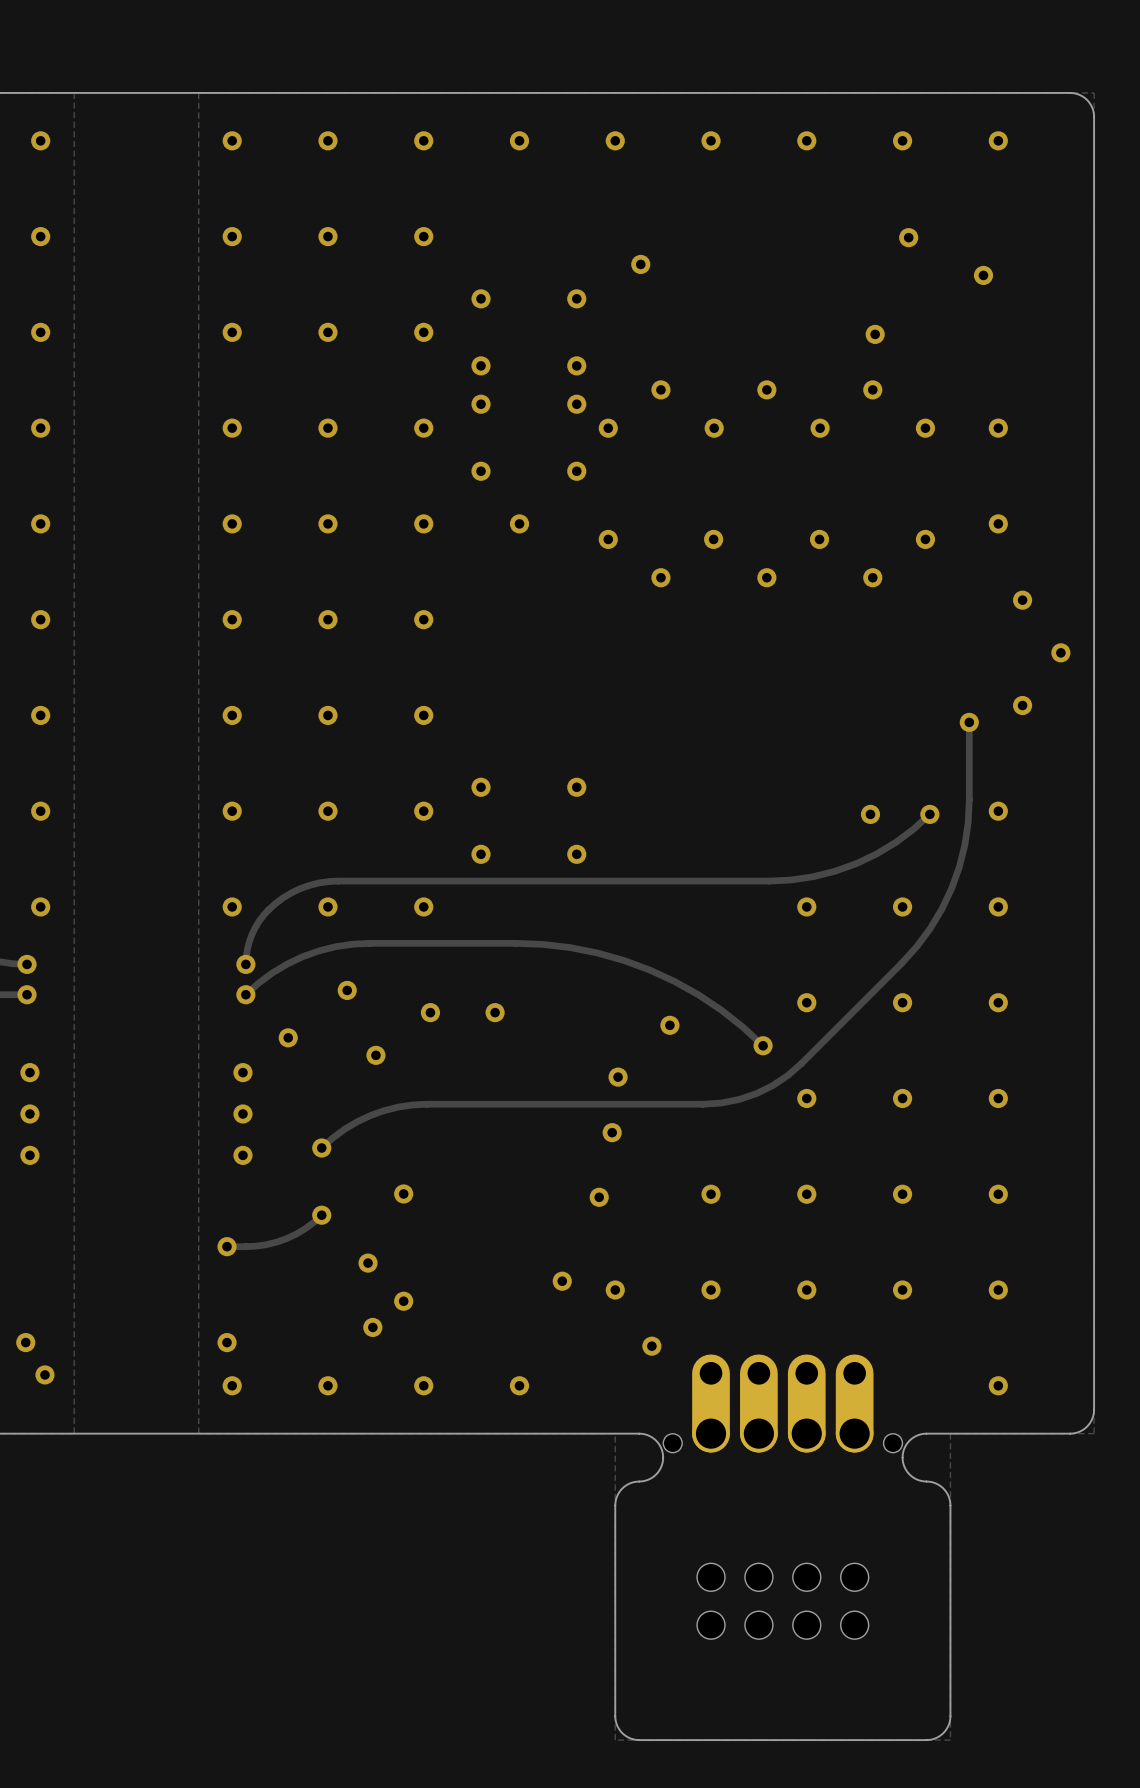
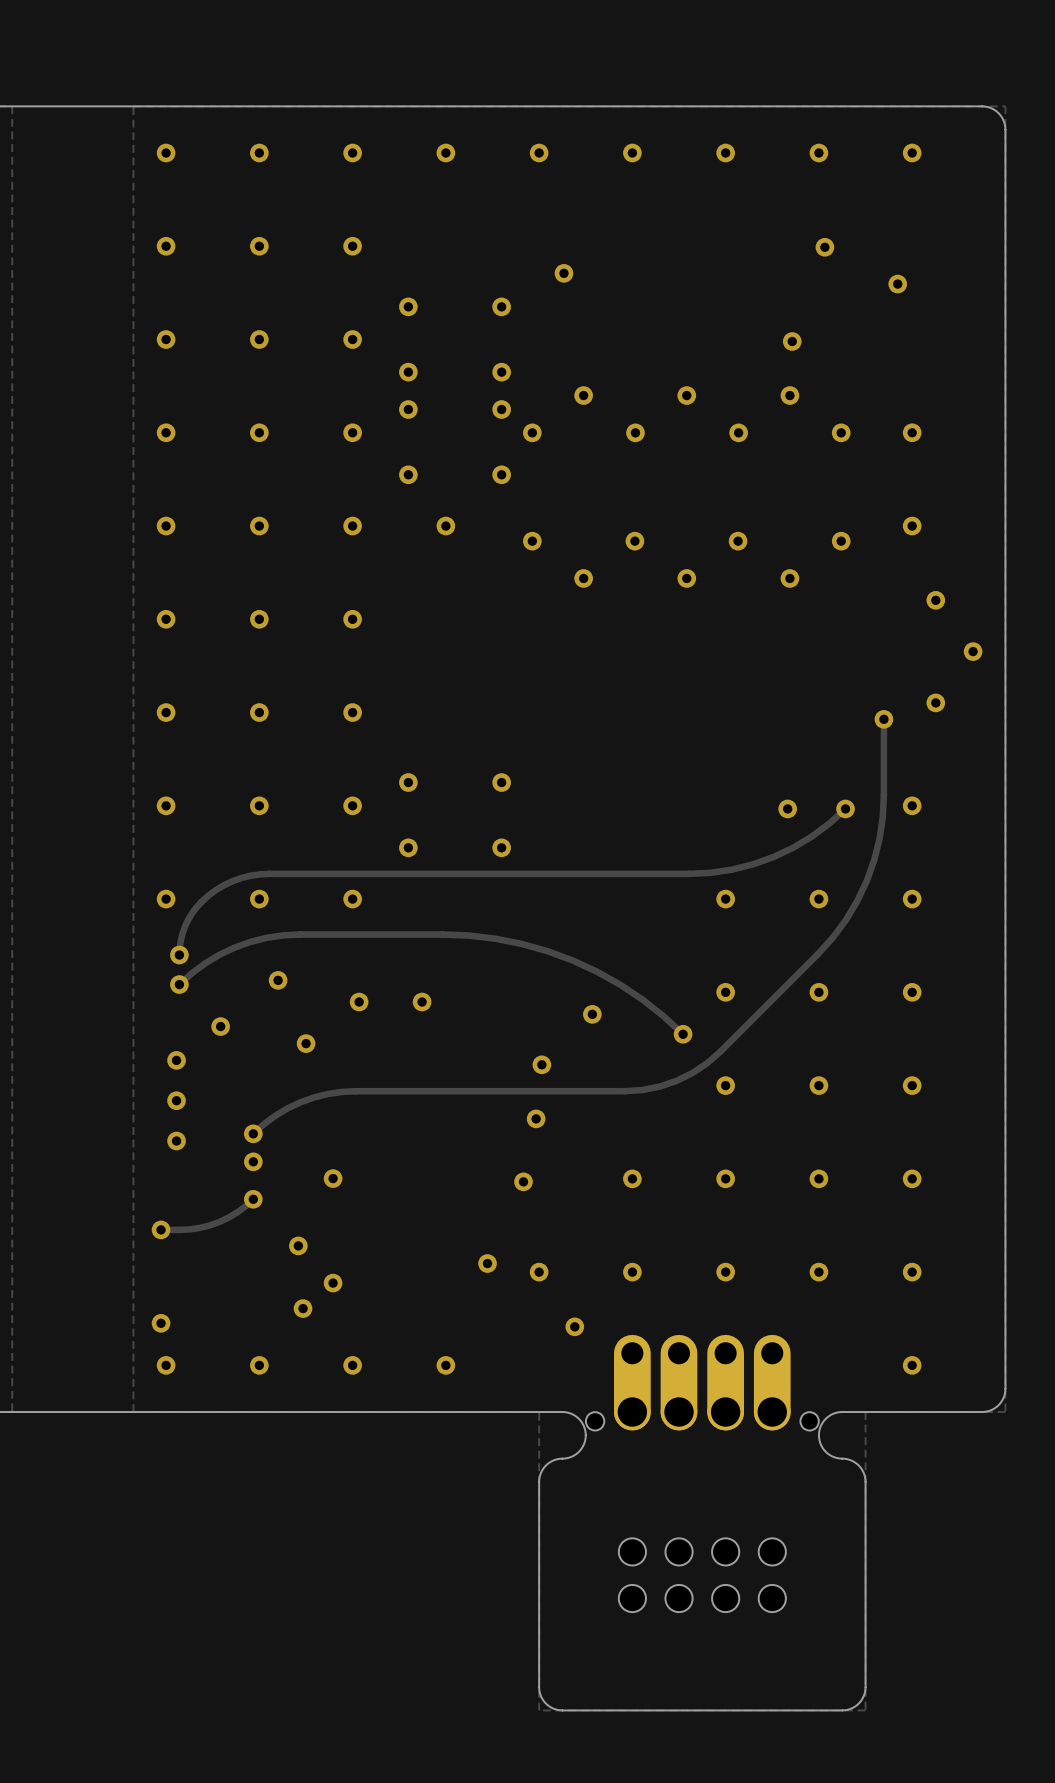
via: none -> (253, 1161)

